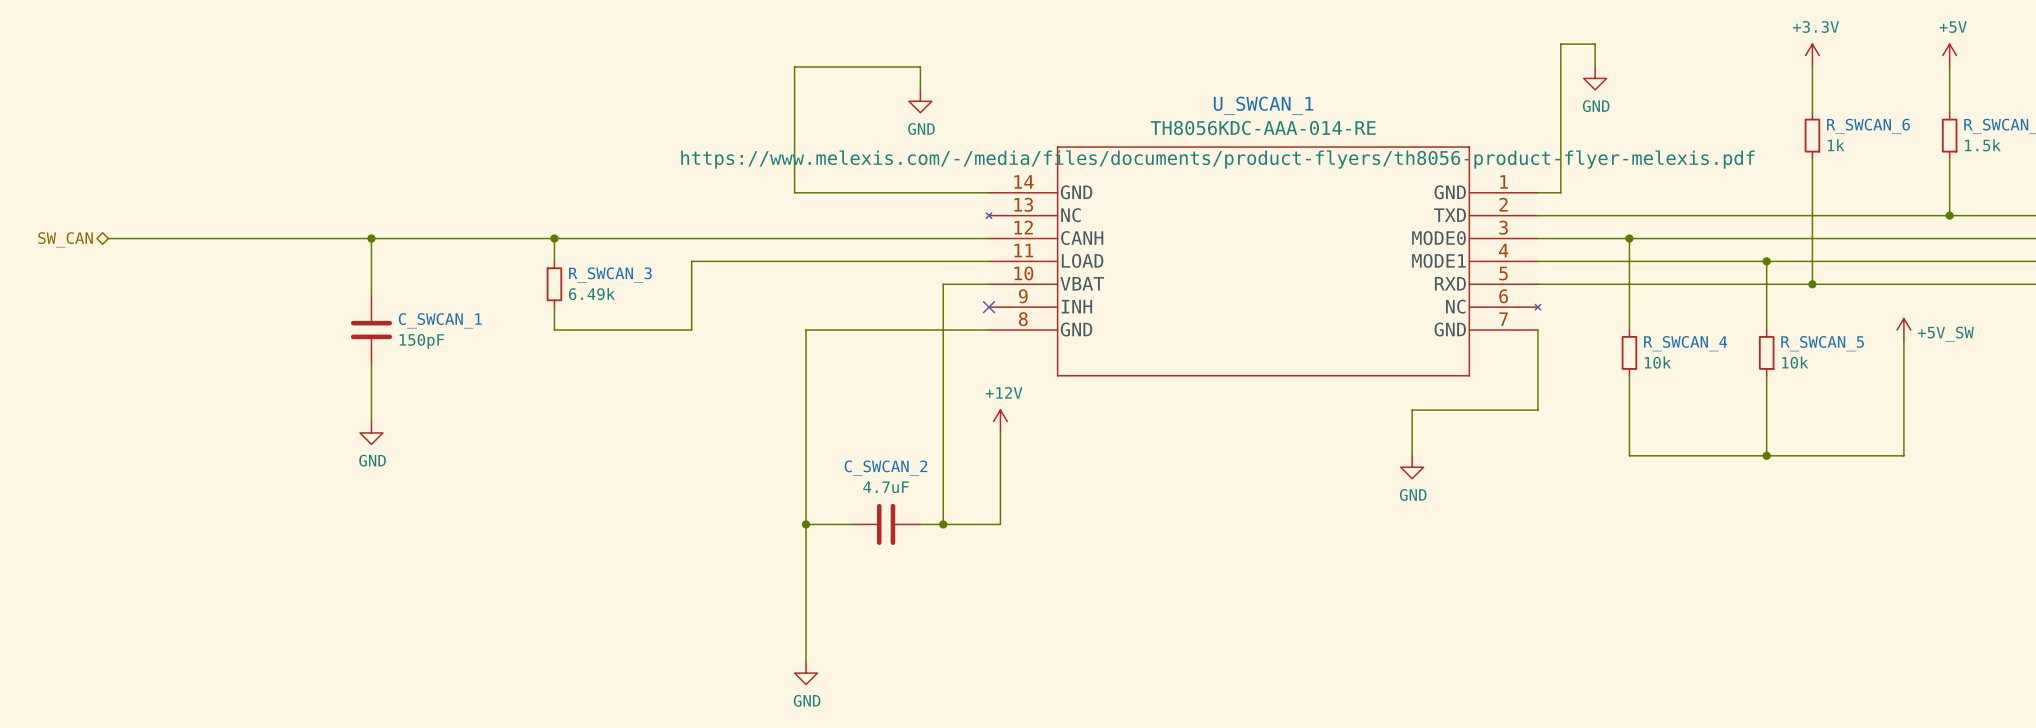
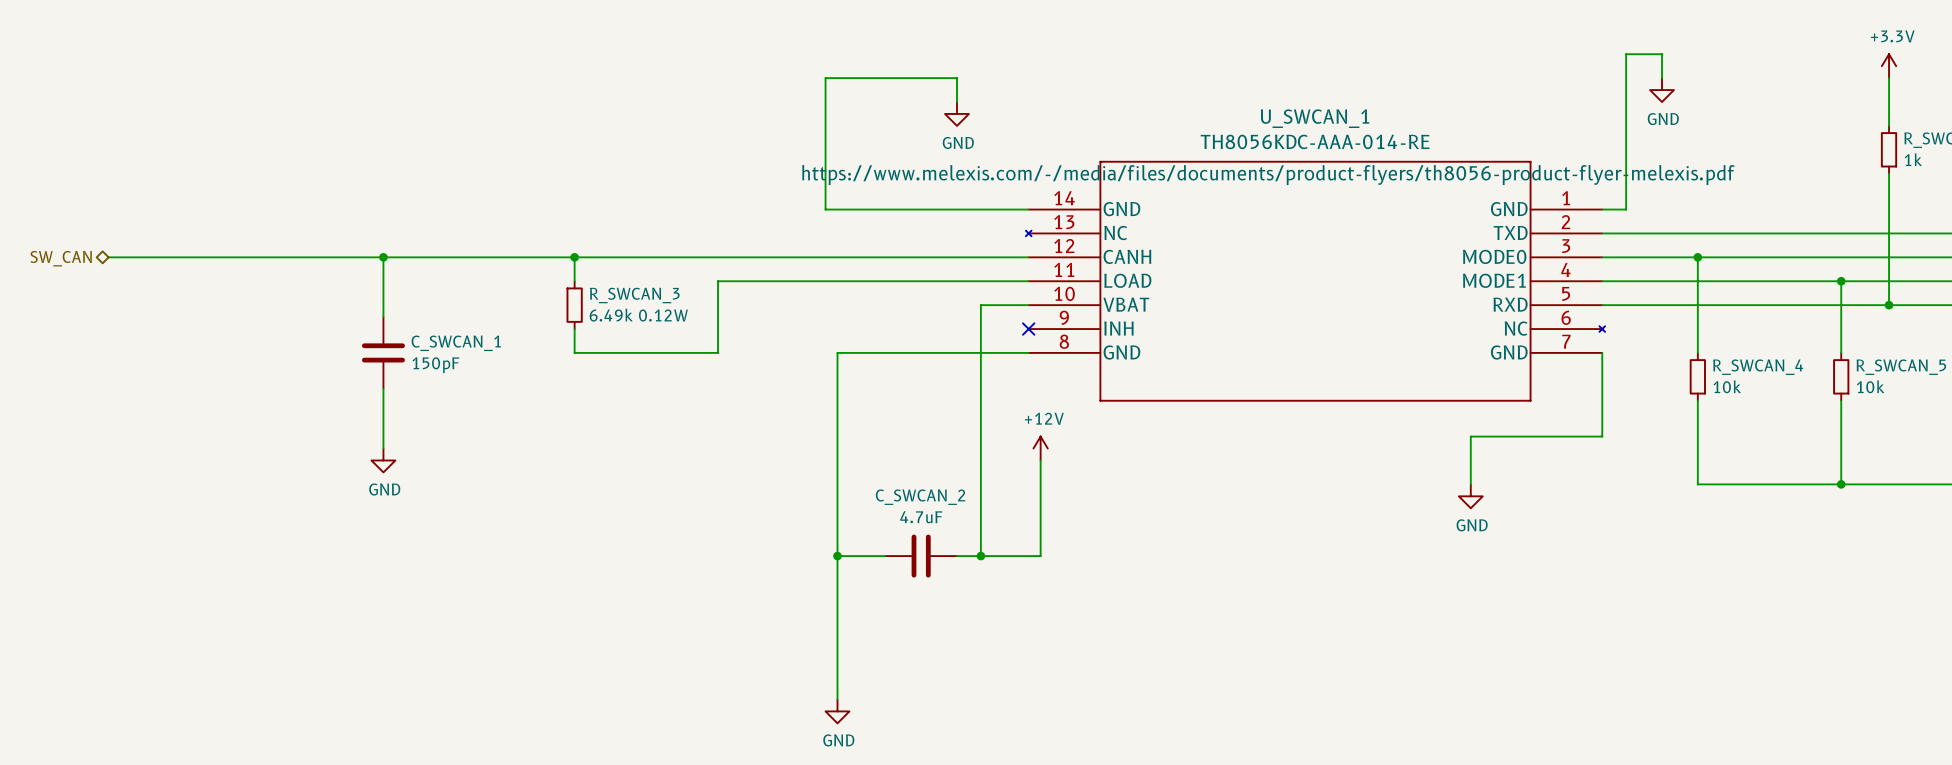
R_SWCAN_3 value: 6.49k (591, 294) -> 6.49k 0.12W (638, 315)

